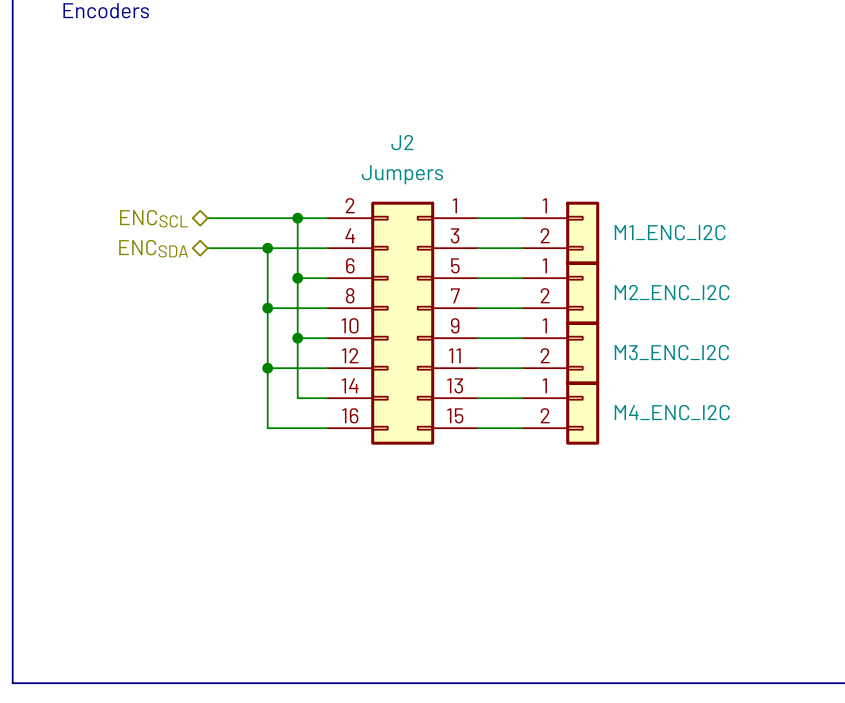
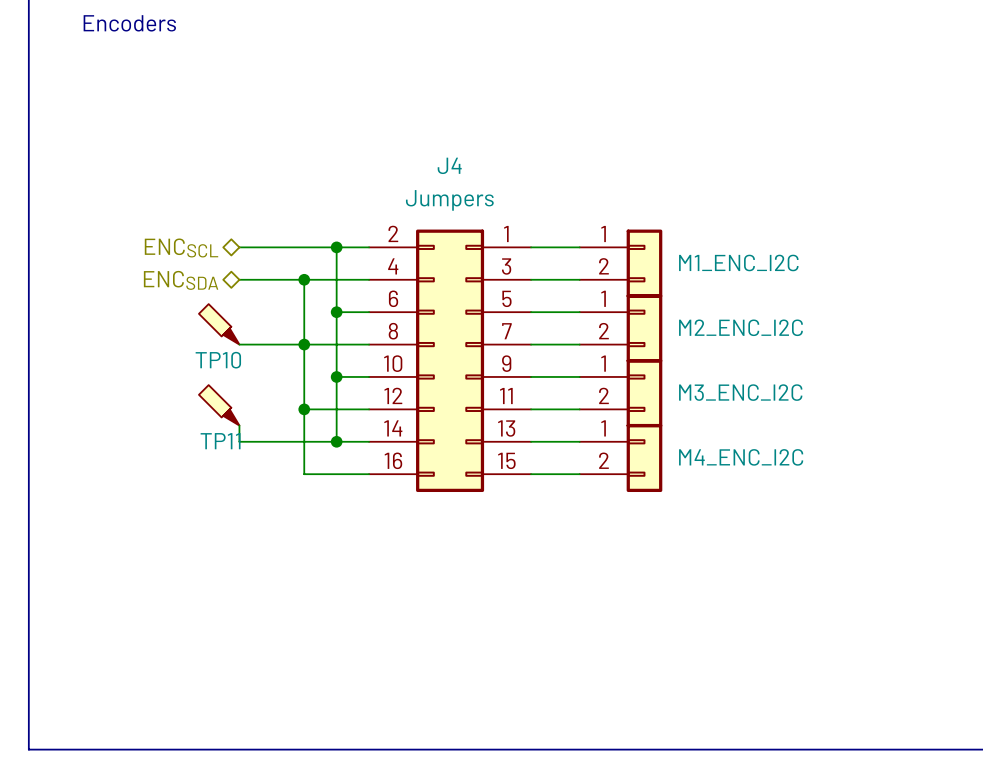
J2 name: J2 (402, 142) -> J4 (449, 165)
TP10: none -> (219, 324)
wire: none -> (239, 344) (304, 344)
TP11: none -> (219, 405)
wire: none -> (239, 425) (239, 441) (336, 441)
junction: none -> (336, 441)

